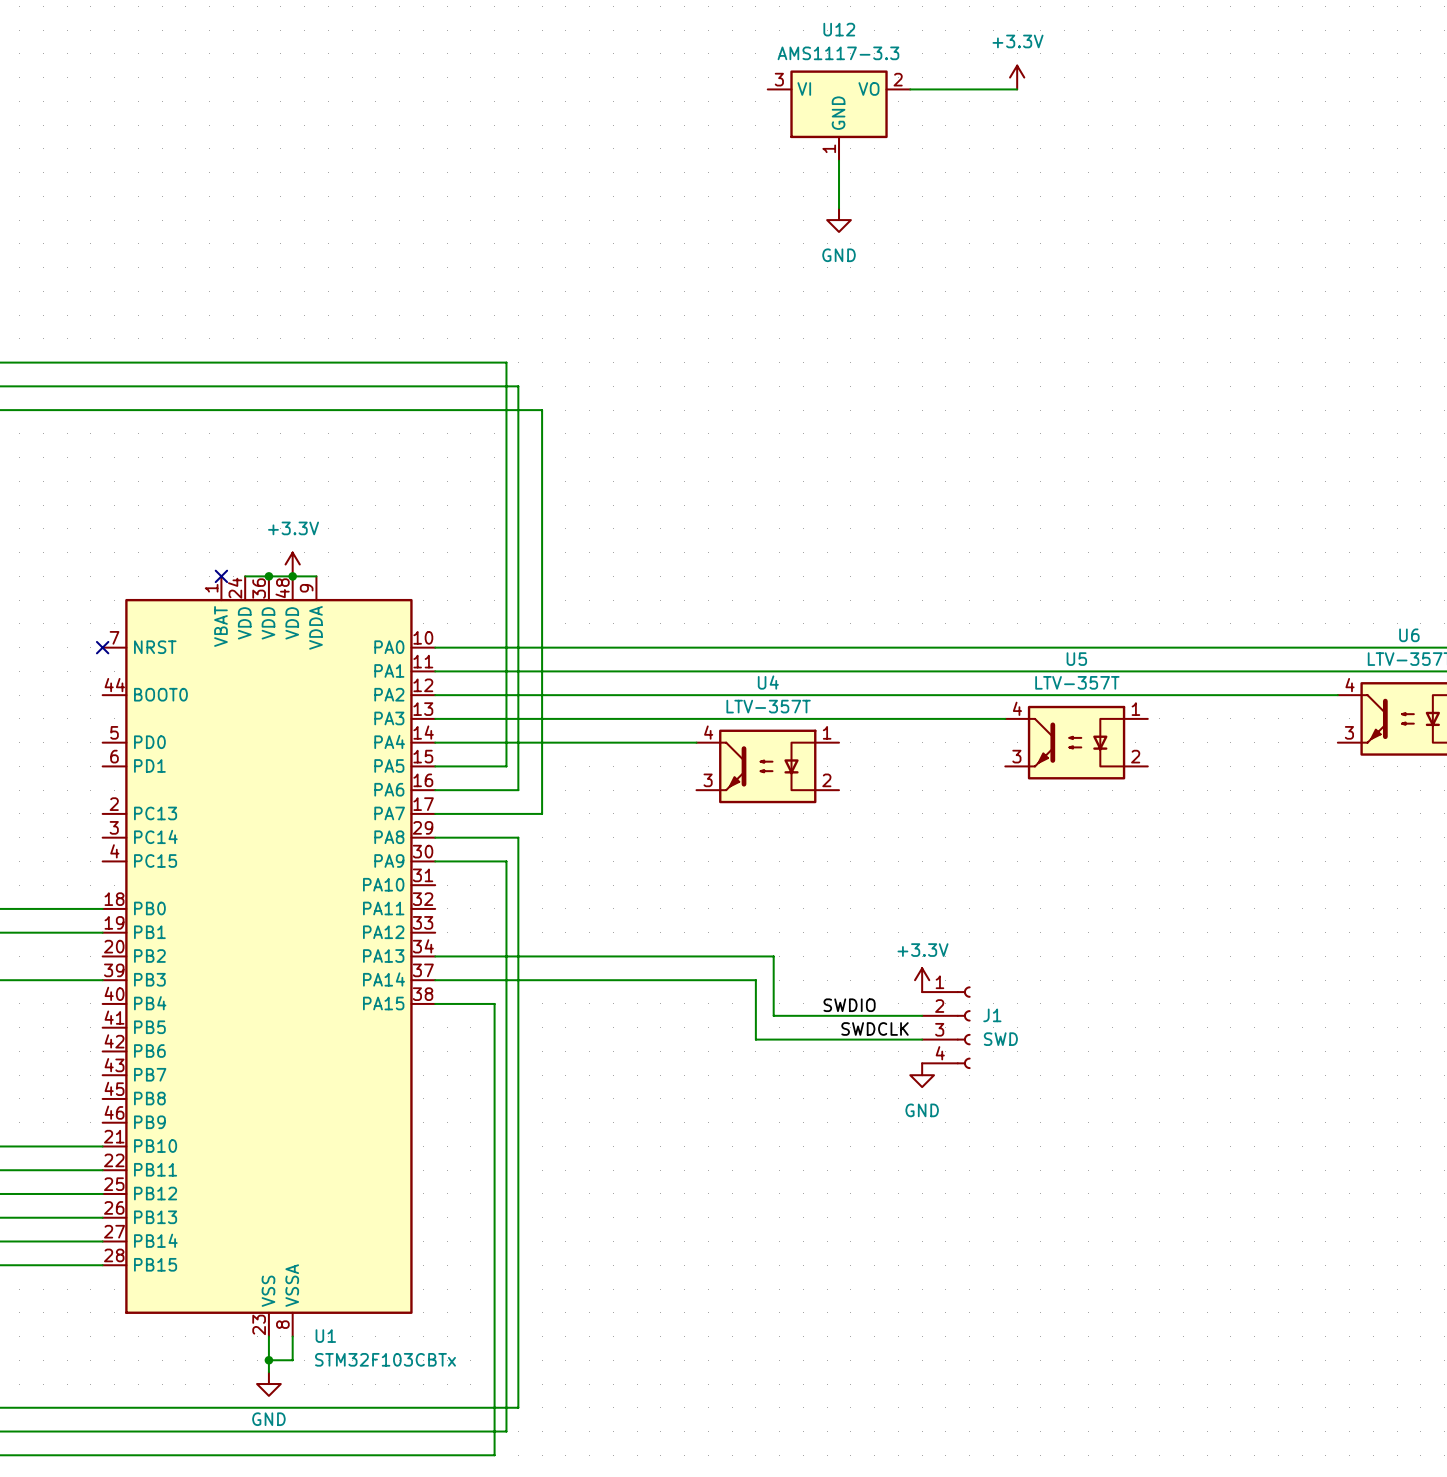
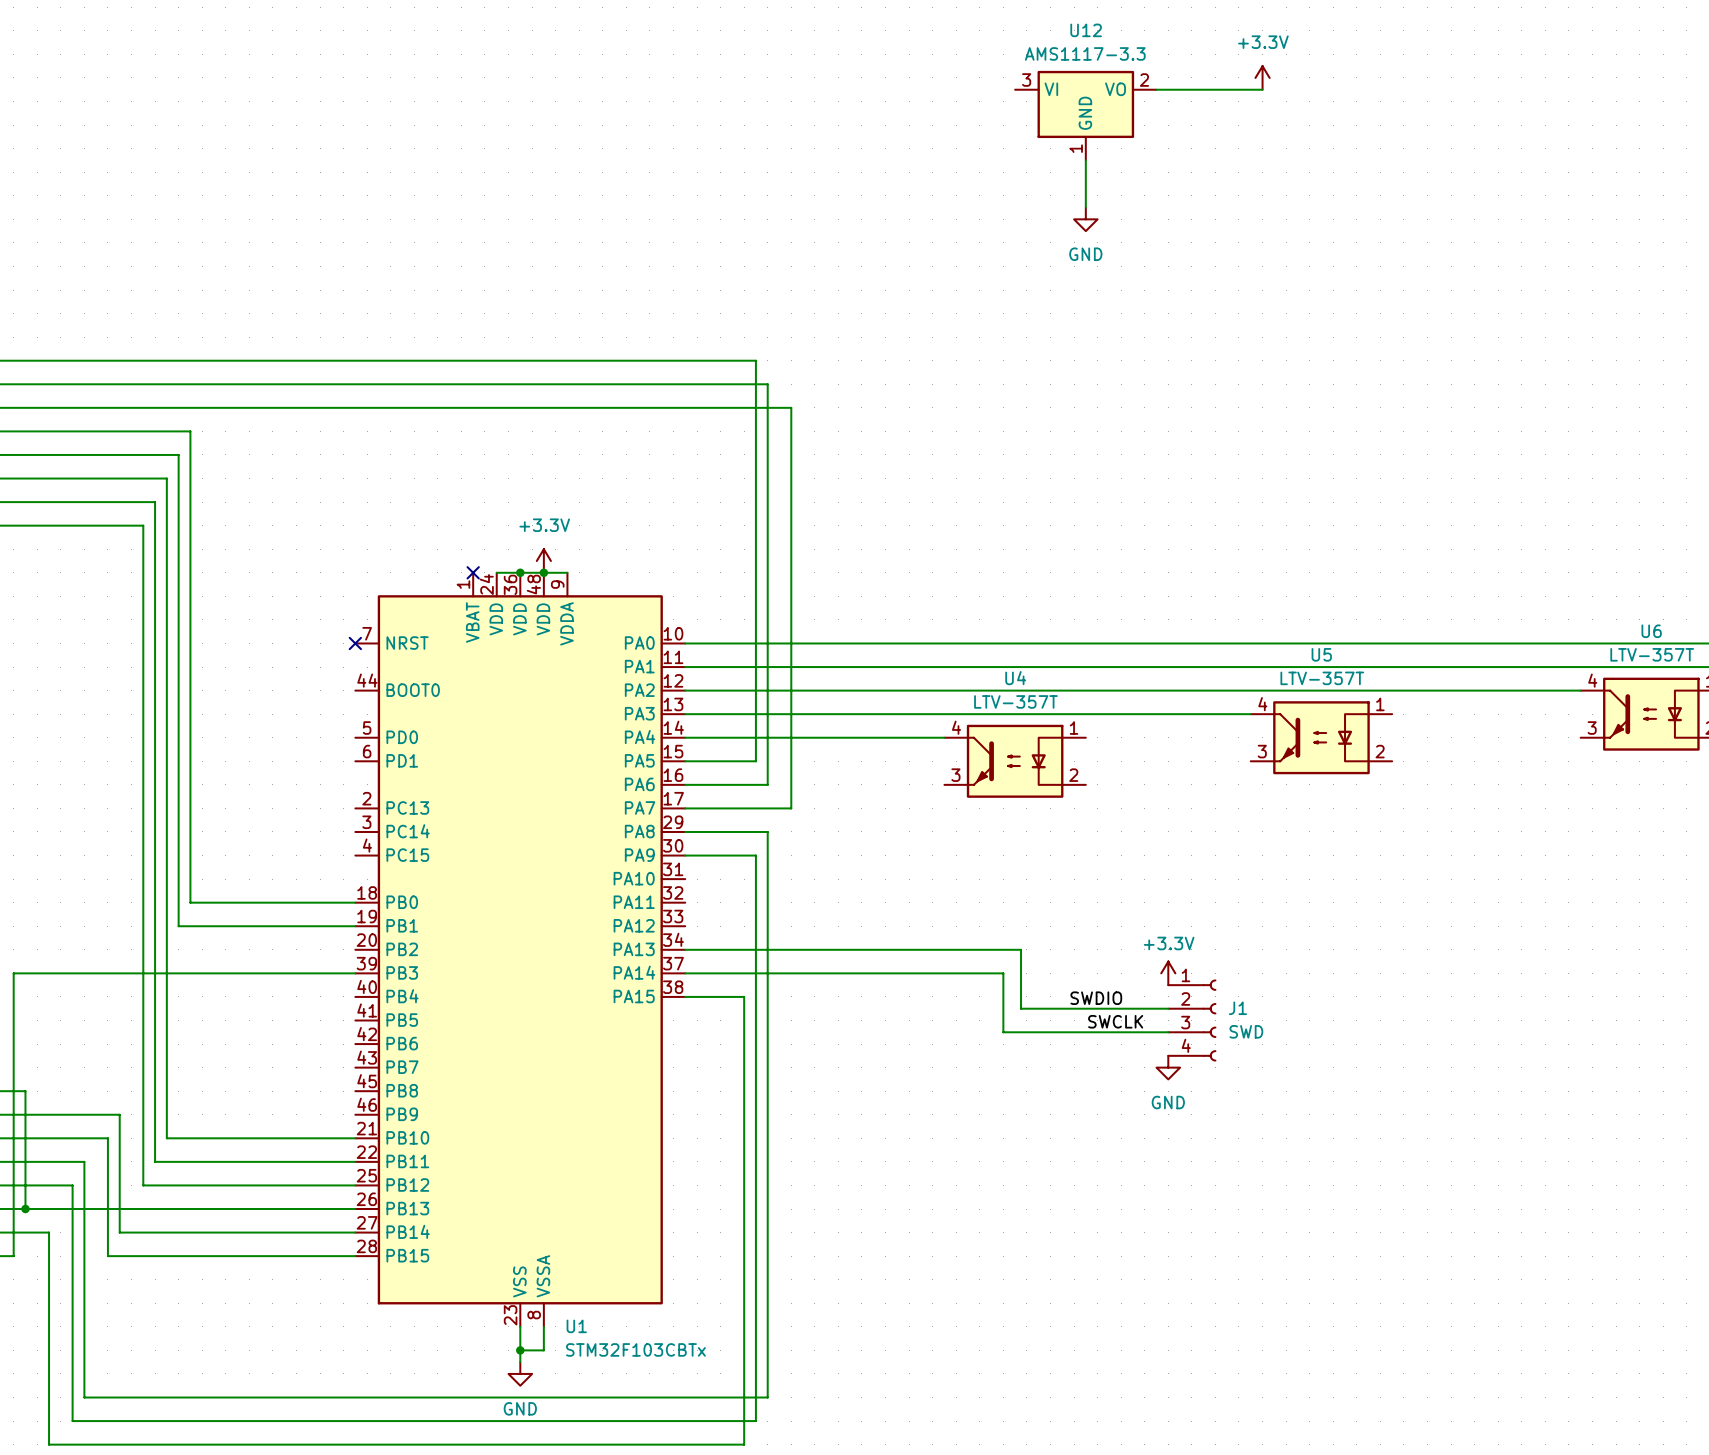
label: SWDCLK (875, 1028) -> SWCLK (1115, 1021)

